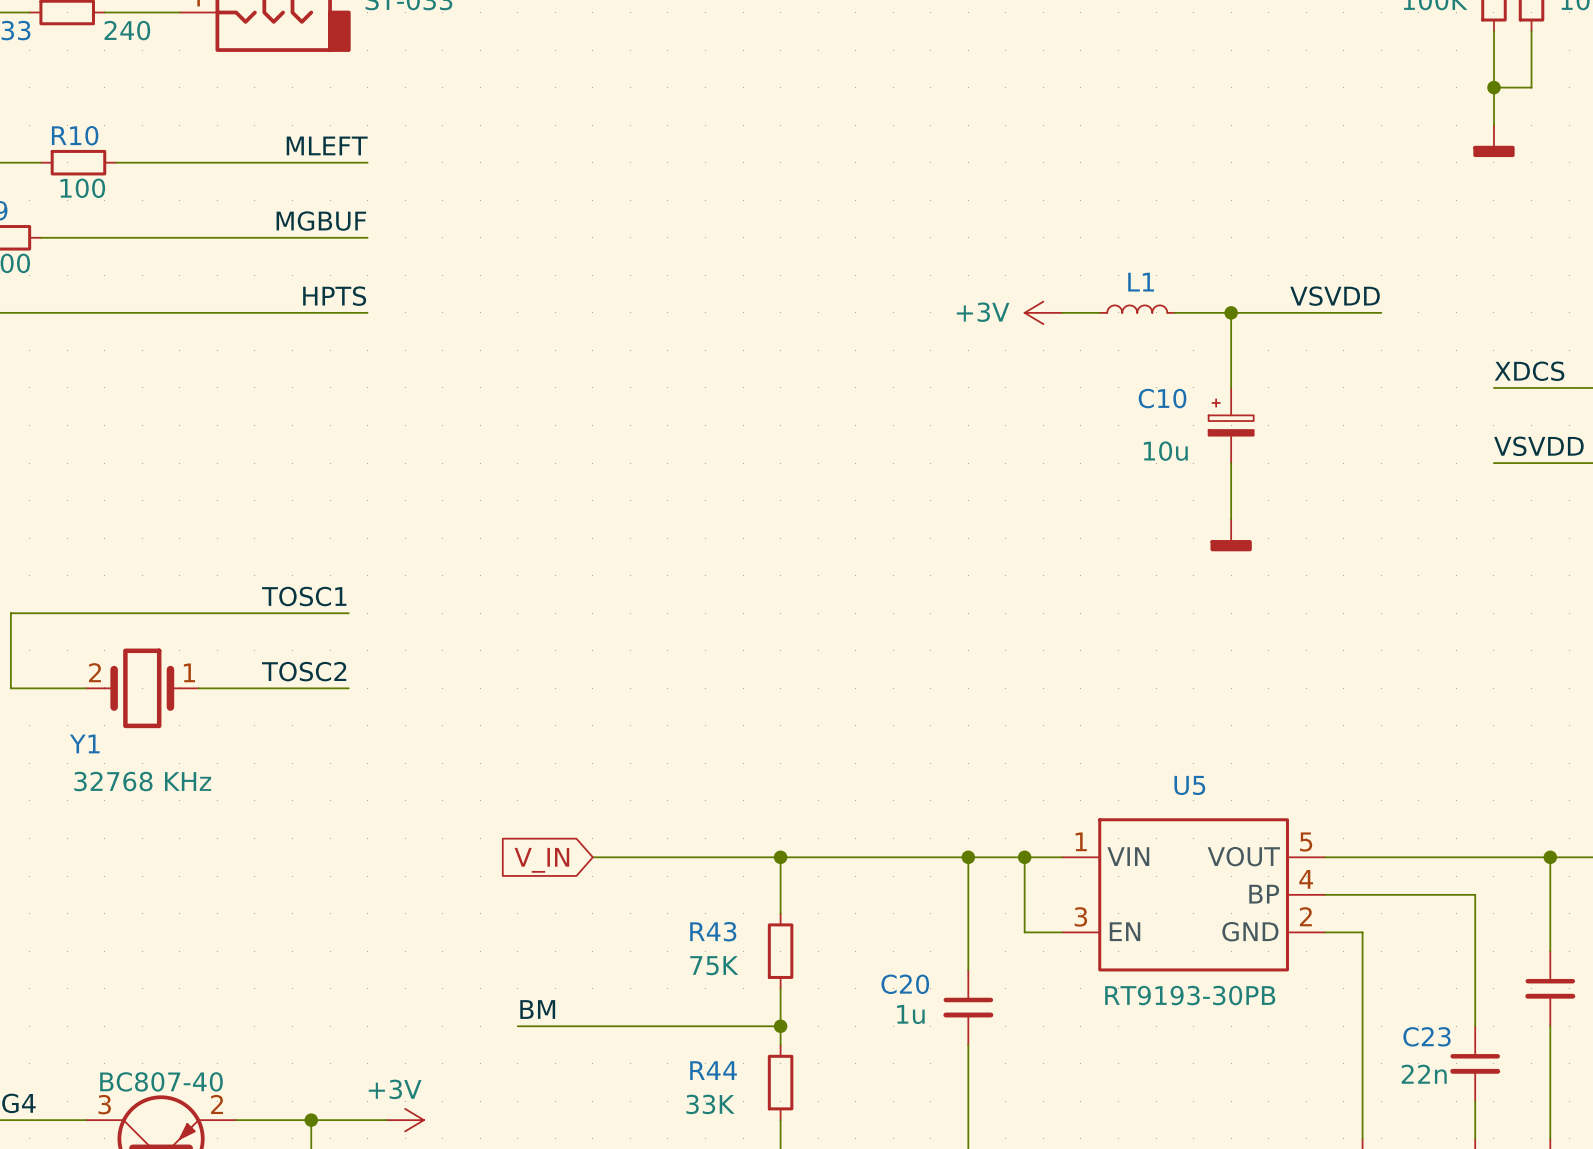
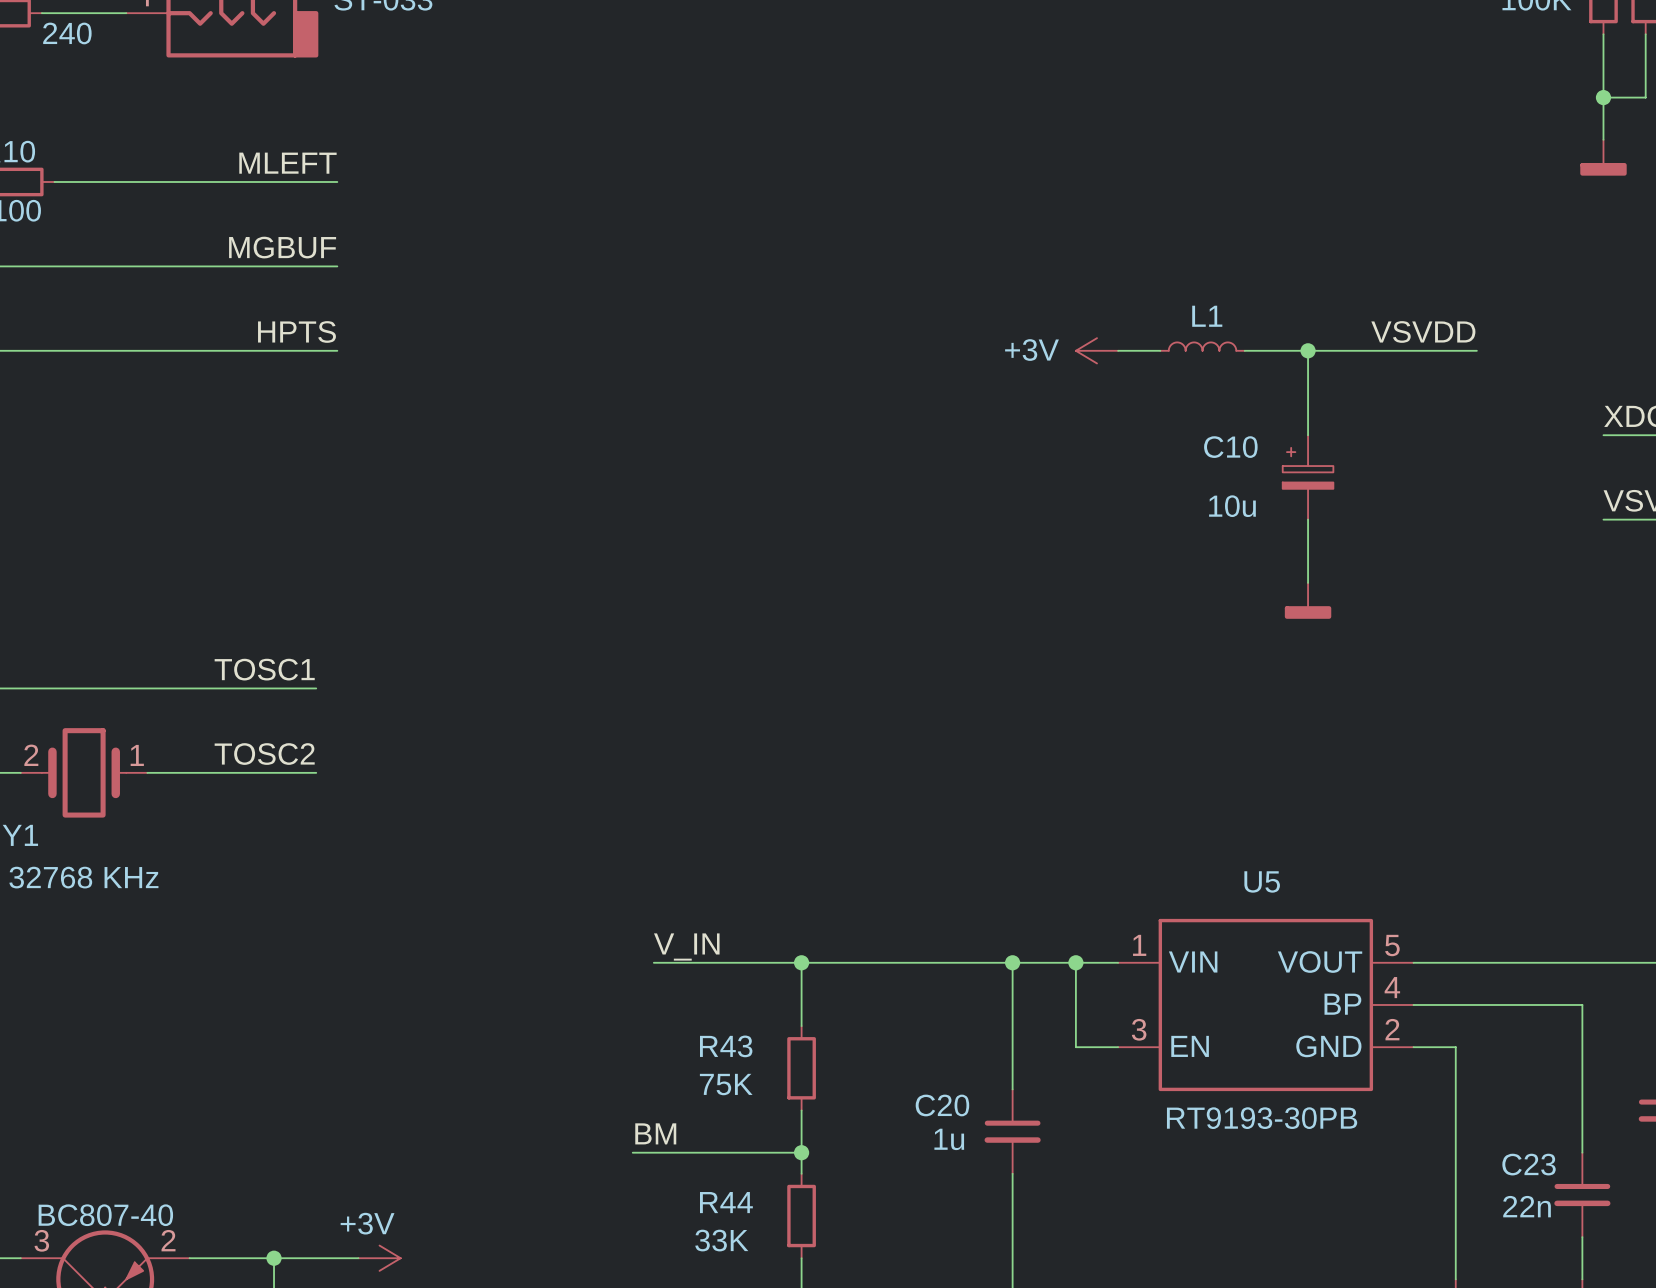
label: none -> V_IN (686, 947)
wire: (592, 857) (649, 857) -> none
global label: V_IN (541, 860) -> none
label position: BM (537, 1009) -> BM (655, 1133)
wire: (517, 1026) (630, 1026) -> none

